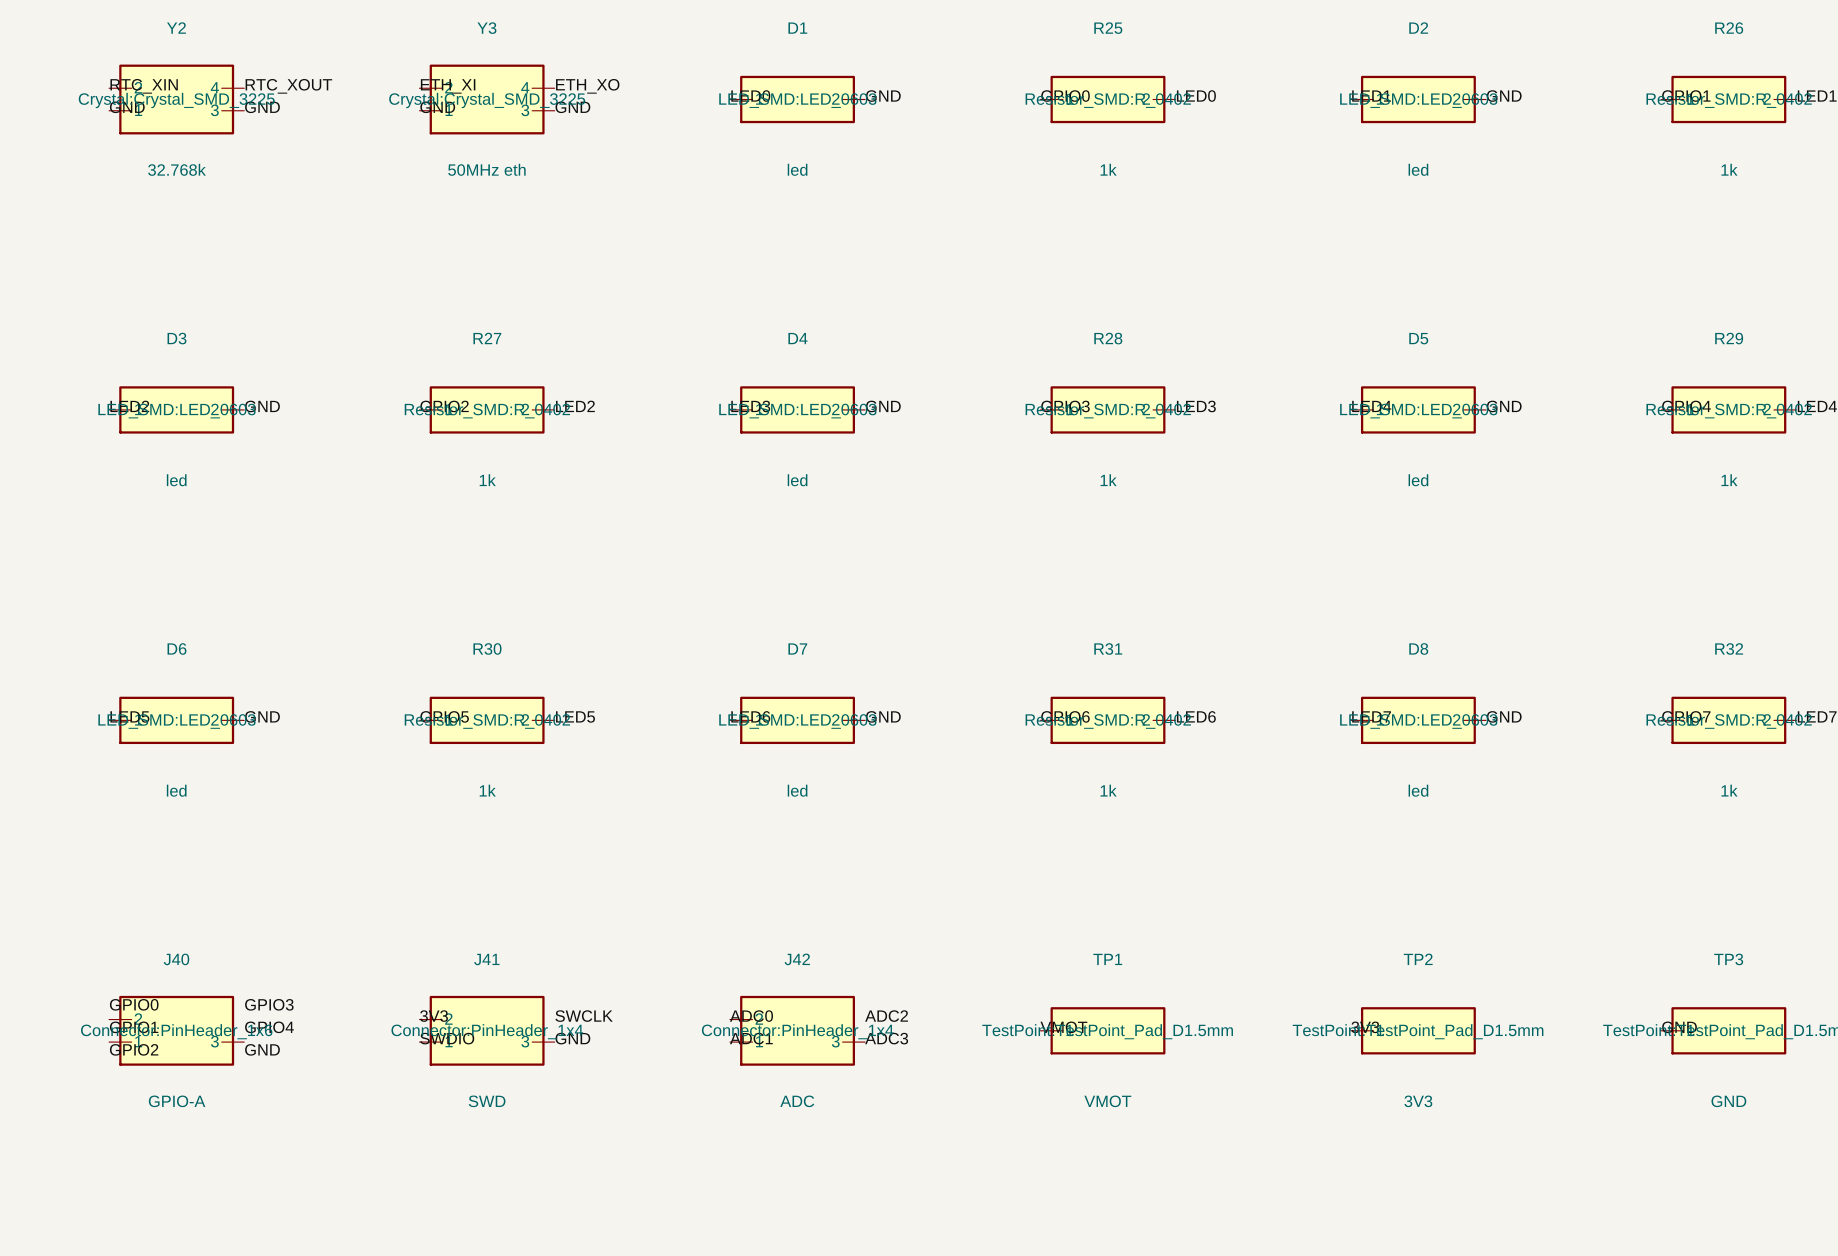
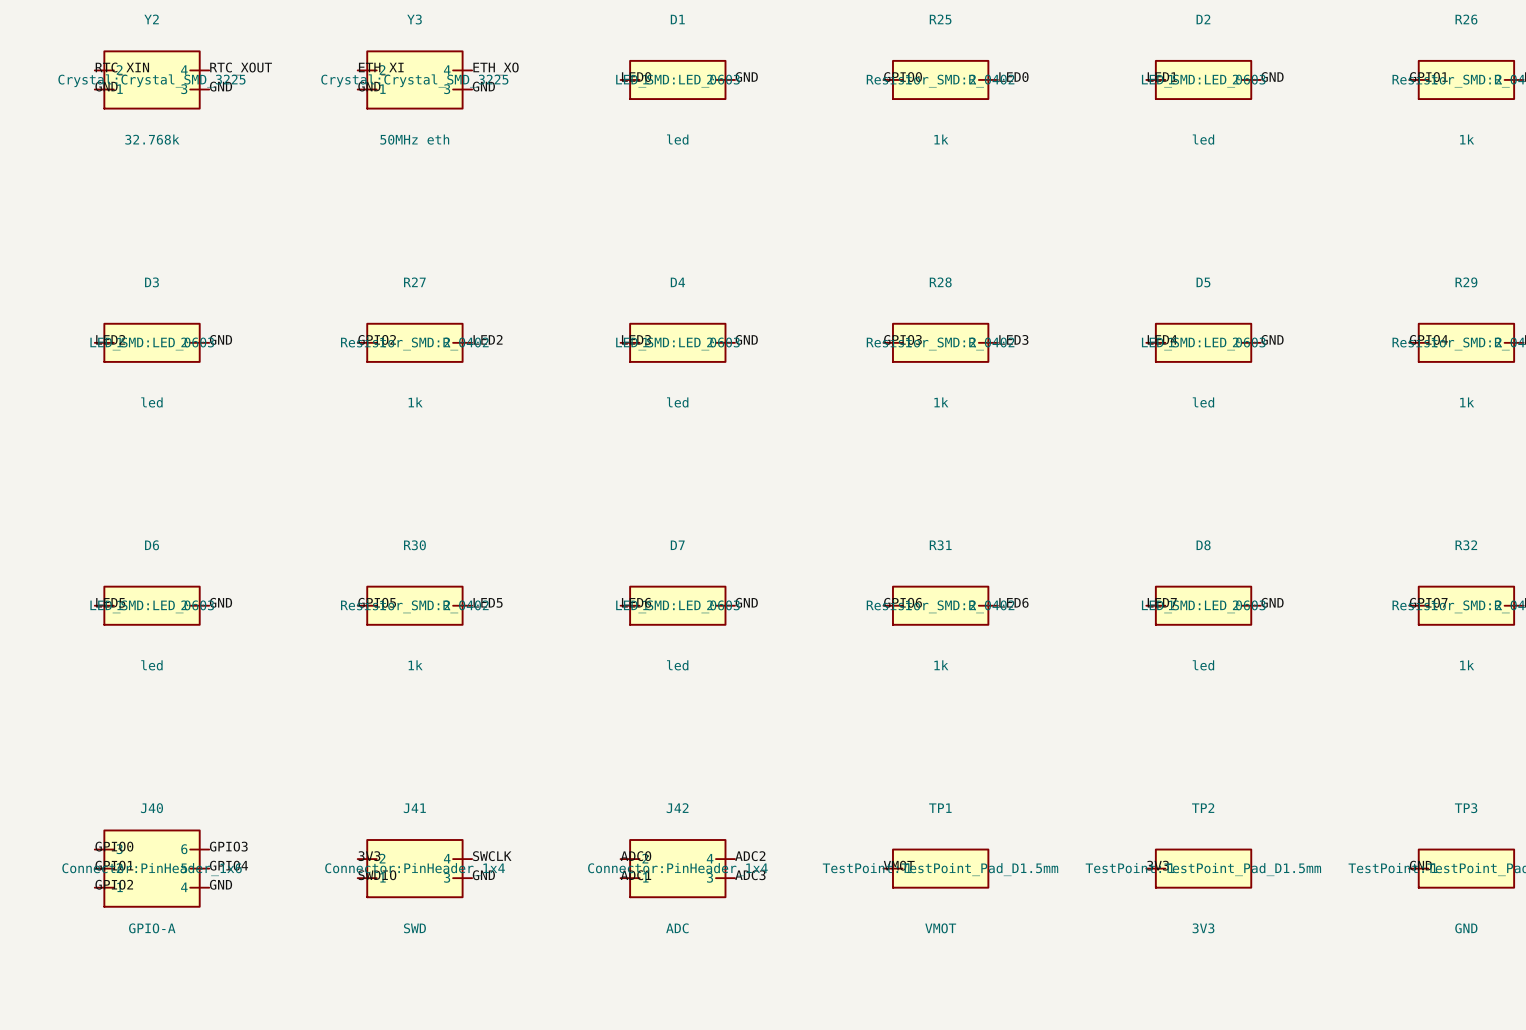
J40 symbol: [109, 995, 245, 1066] -> [94, 829, 210, 908]
J41 symbol: [419, 995, 555, 1066] -> [357, 839, 473, 899]
J42 symbol: [729, 995, 866, 1066] -> [620, 839, 736, 899]

